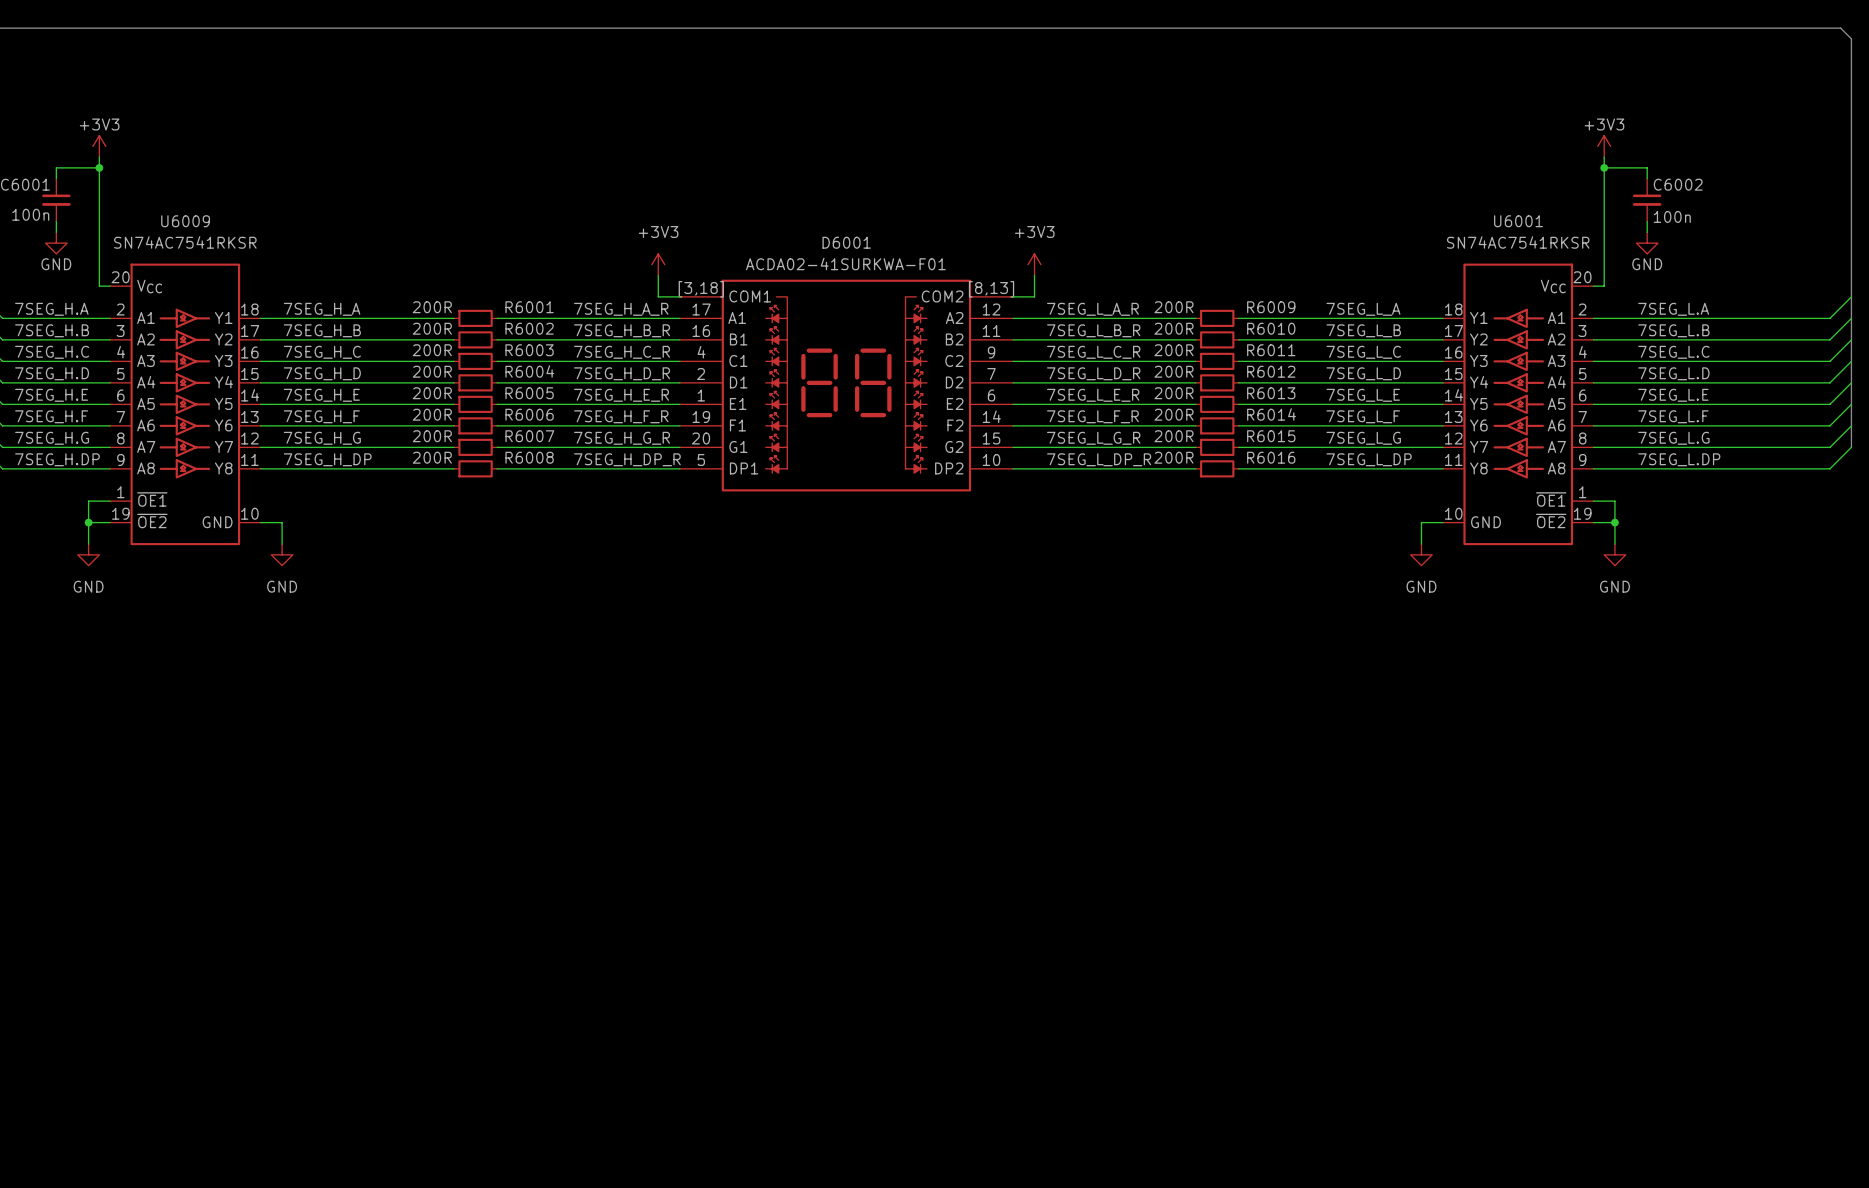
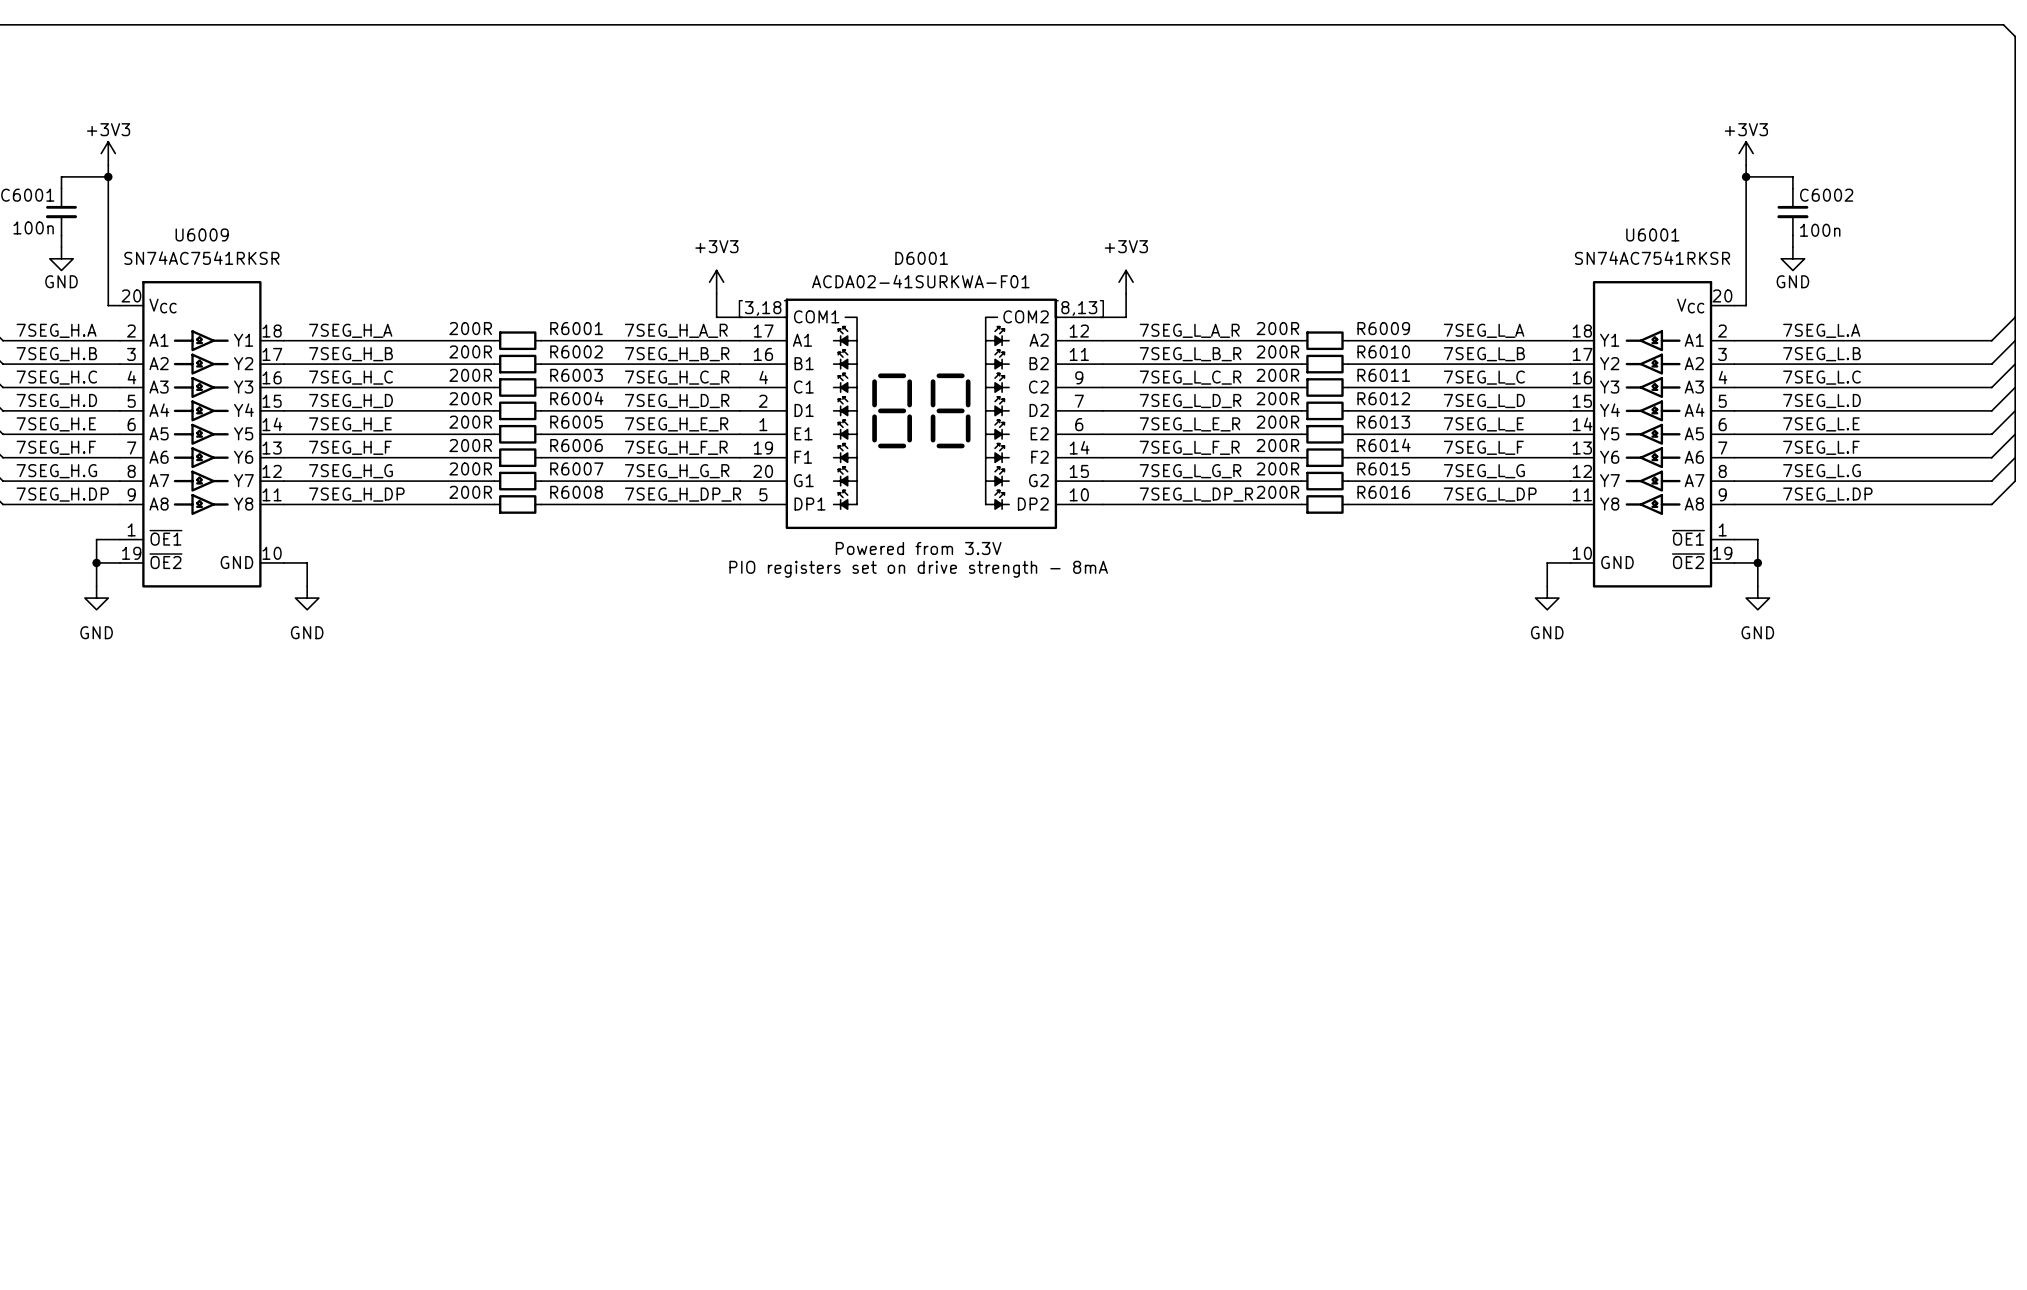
text: none -> Powered from 3.3V (918, 548)
text: none -> PIO registers set on drive strength - 8mA (918, 569)

